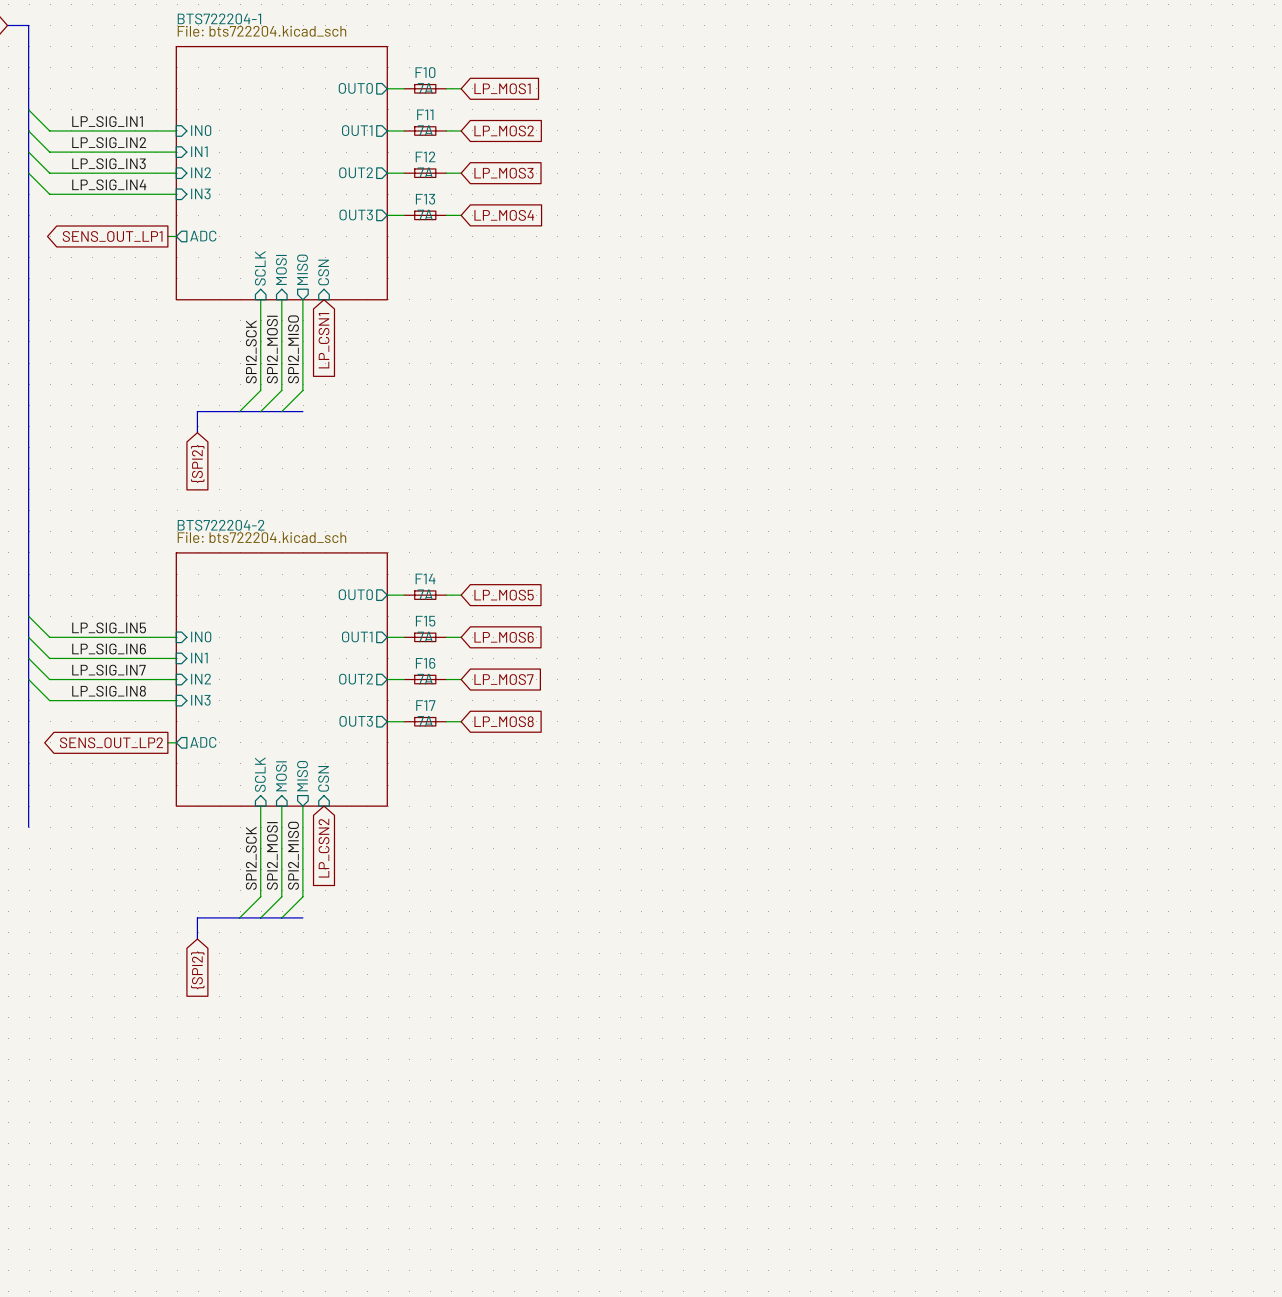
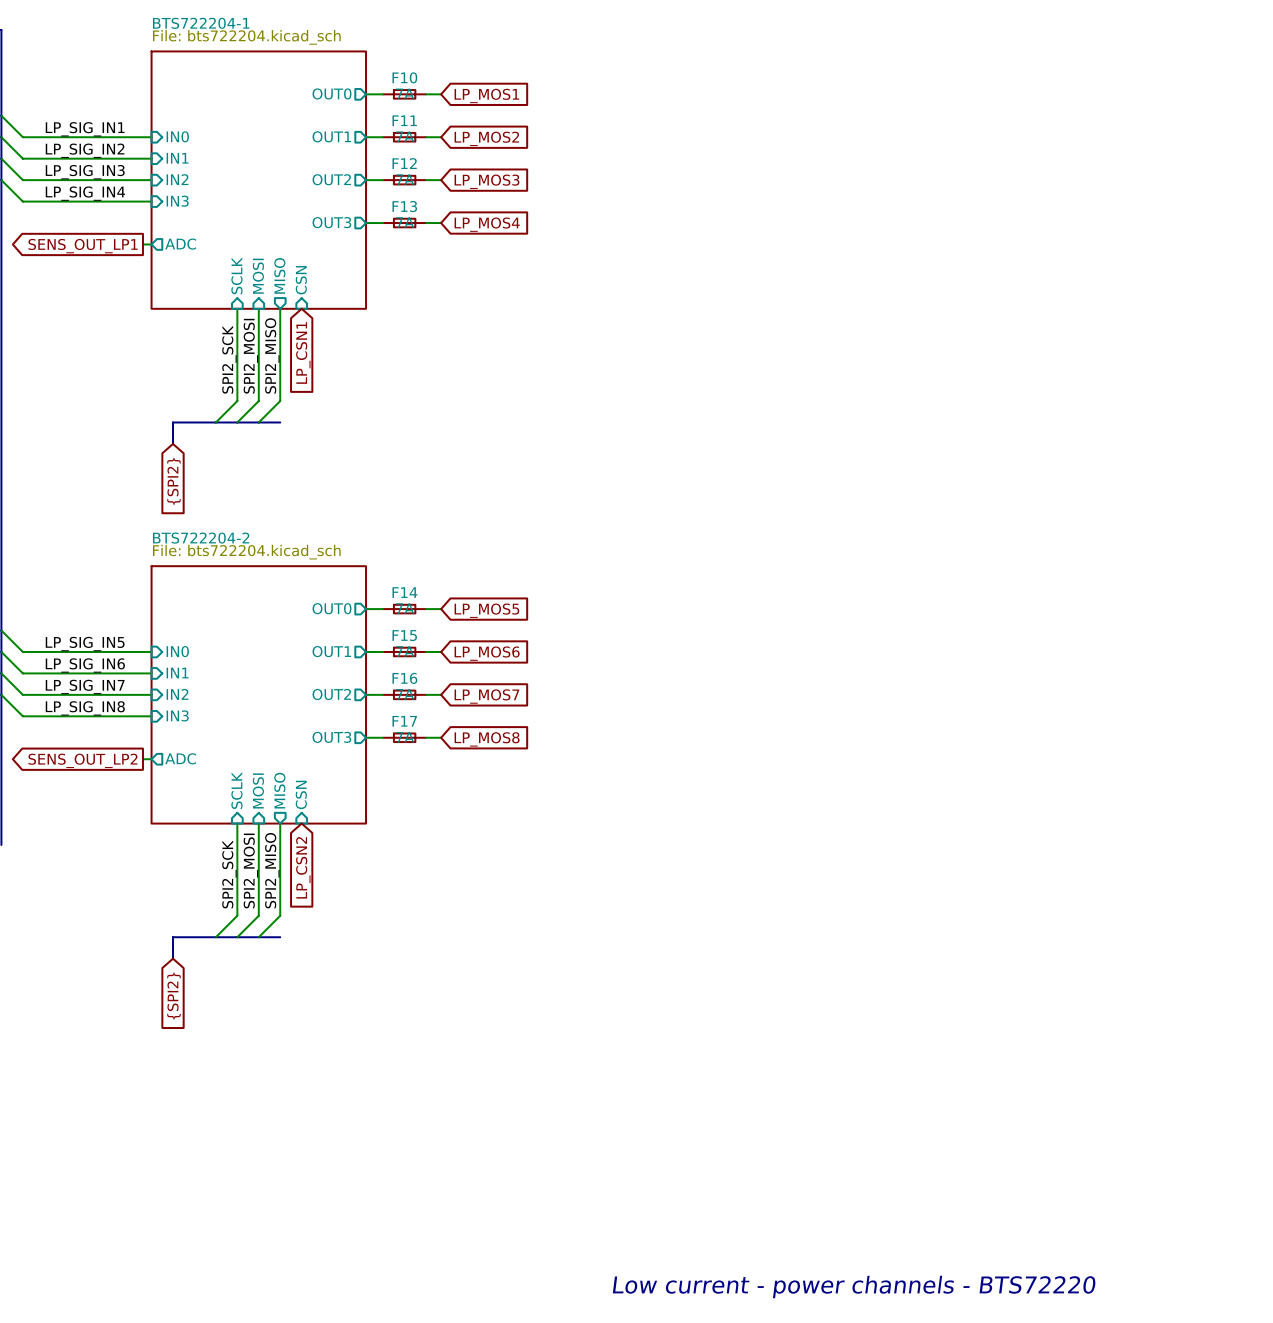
text: none -> Low current - power channels - BTS72220 (854, 1286)

